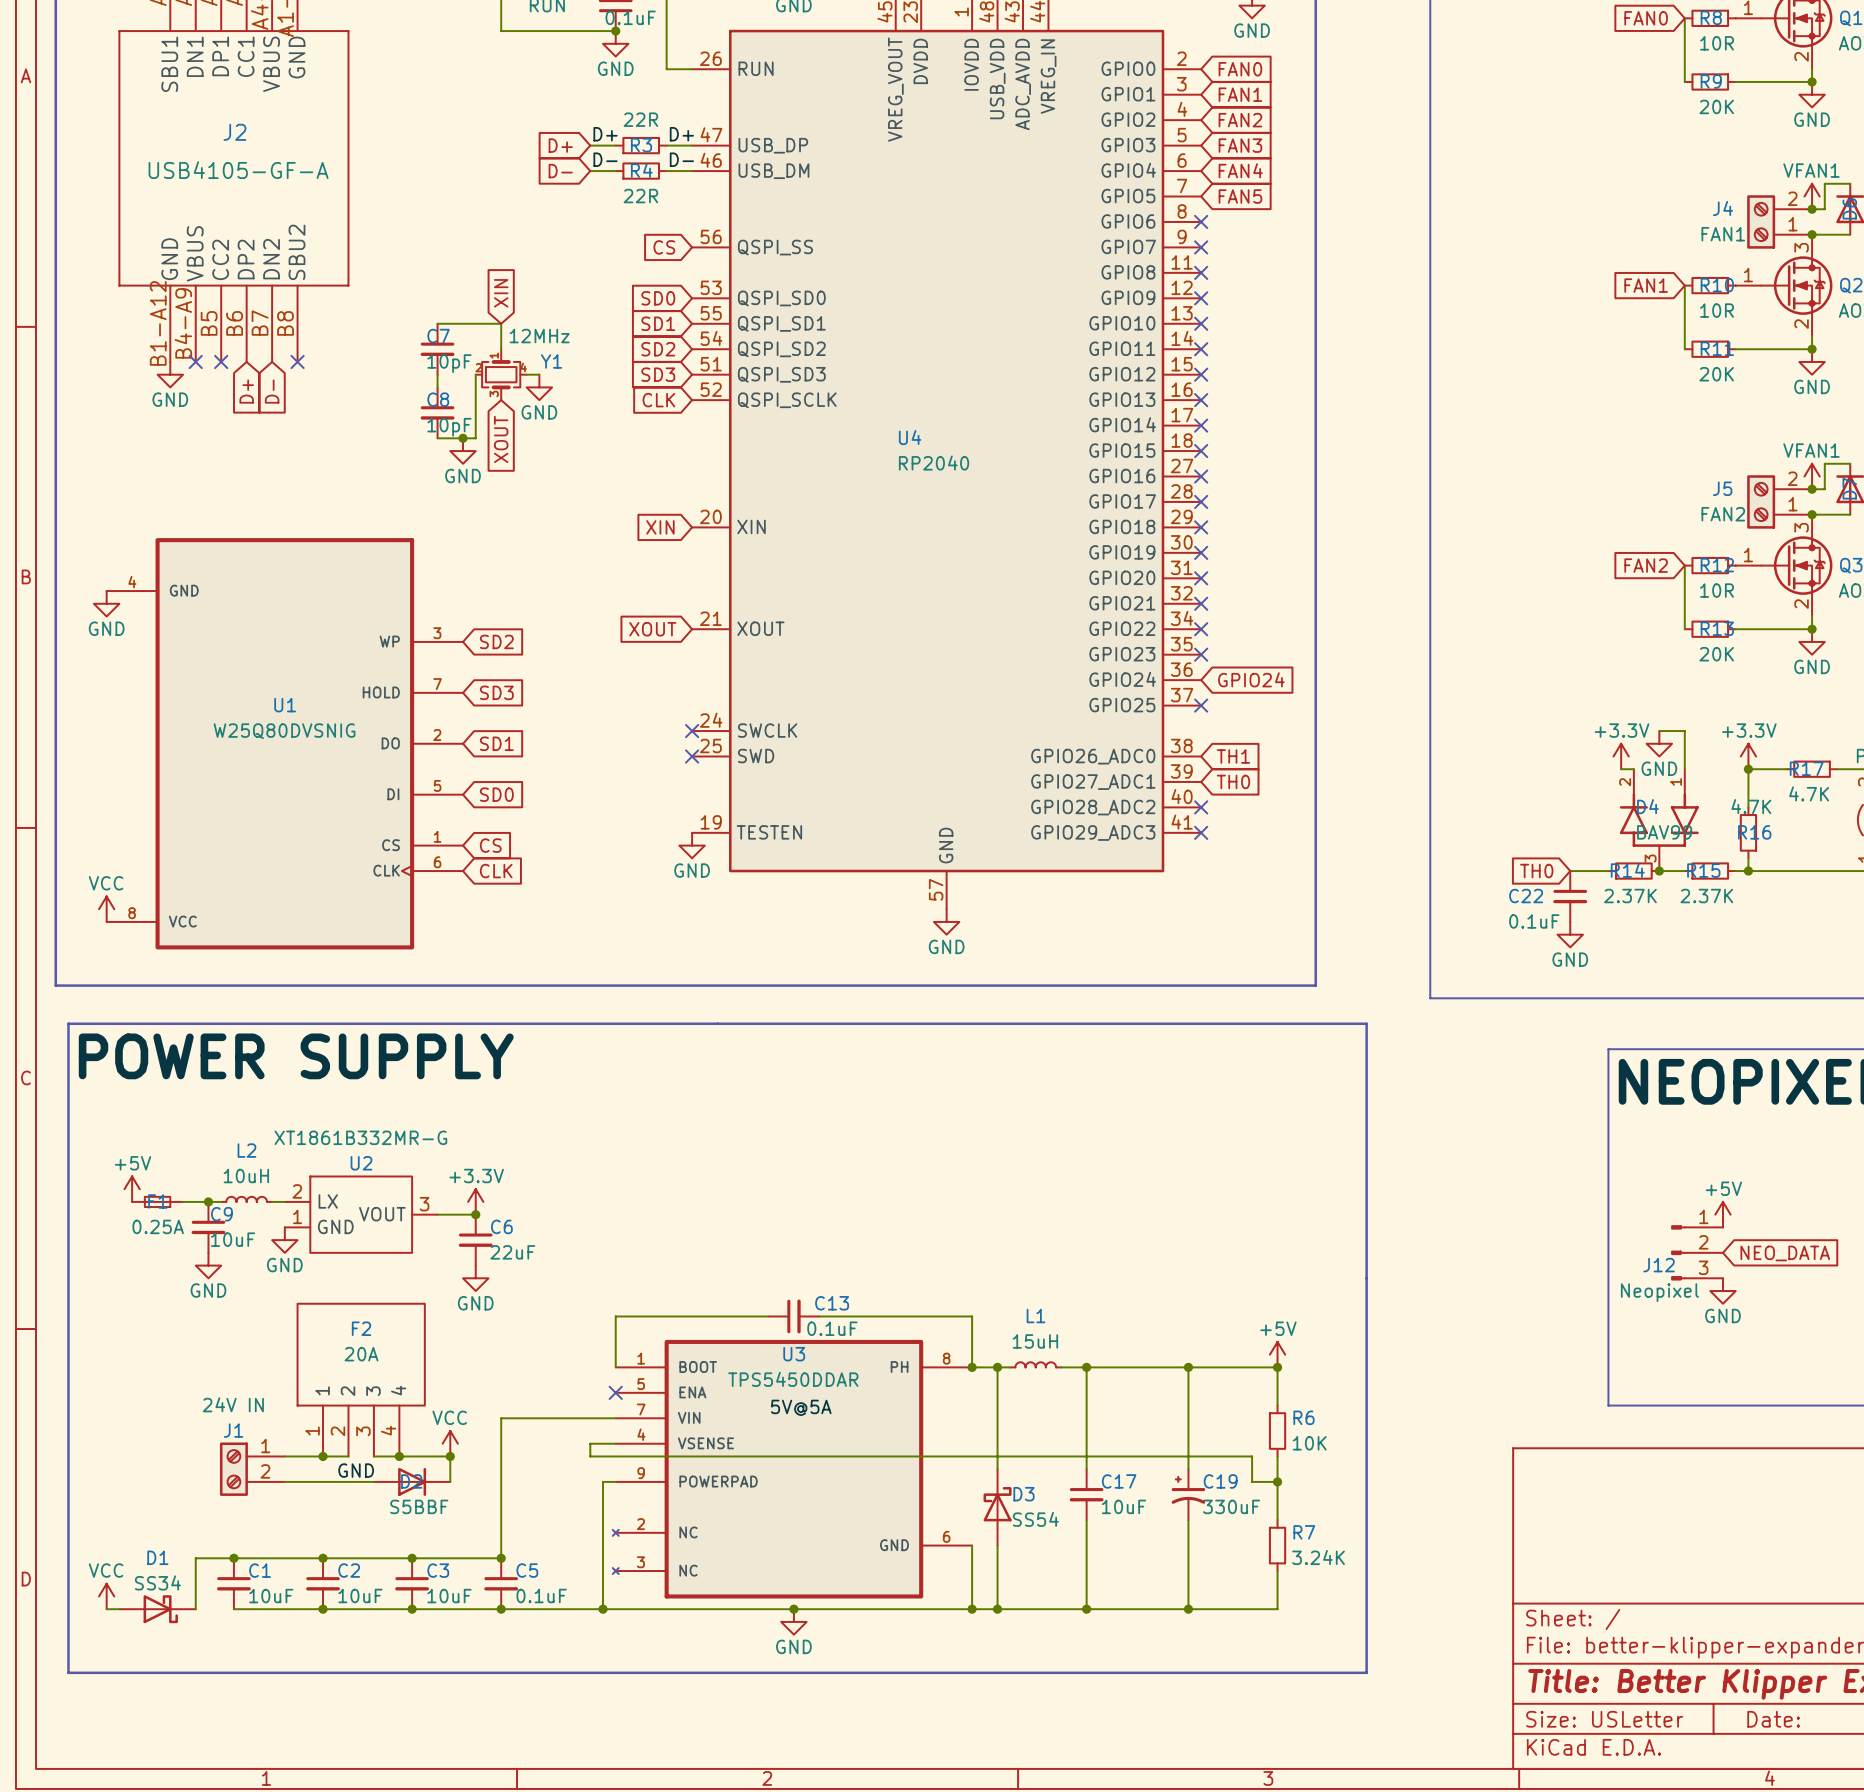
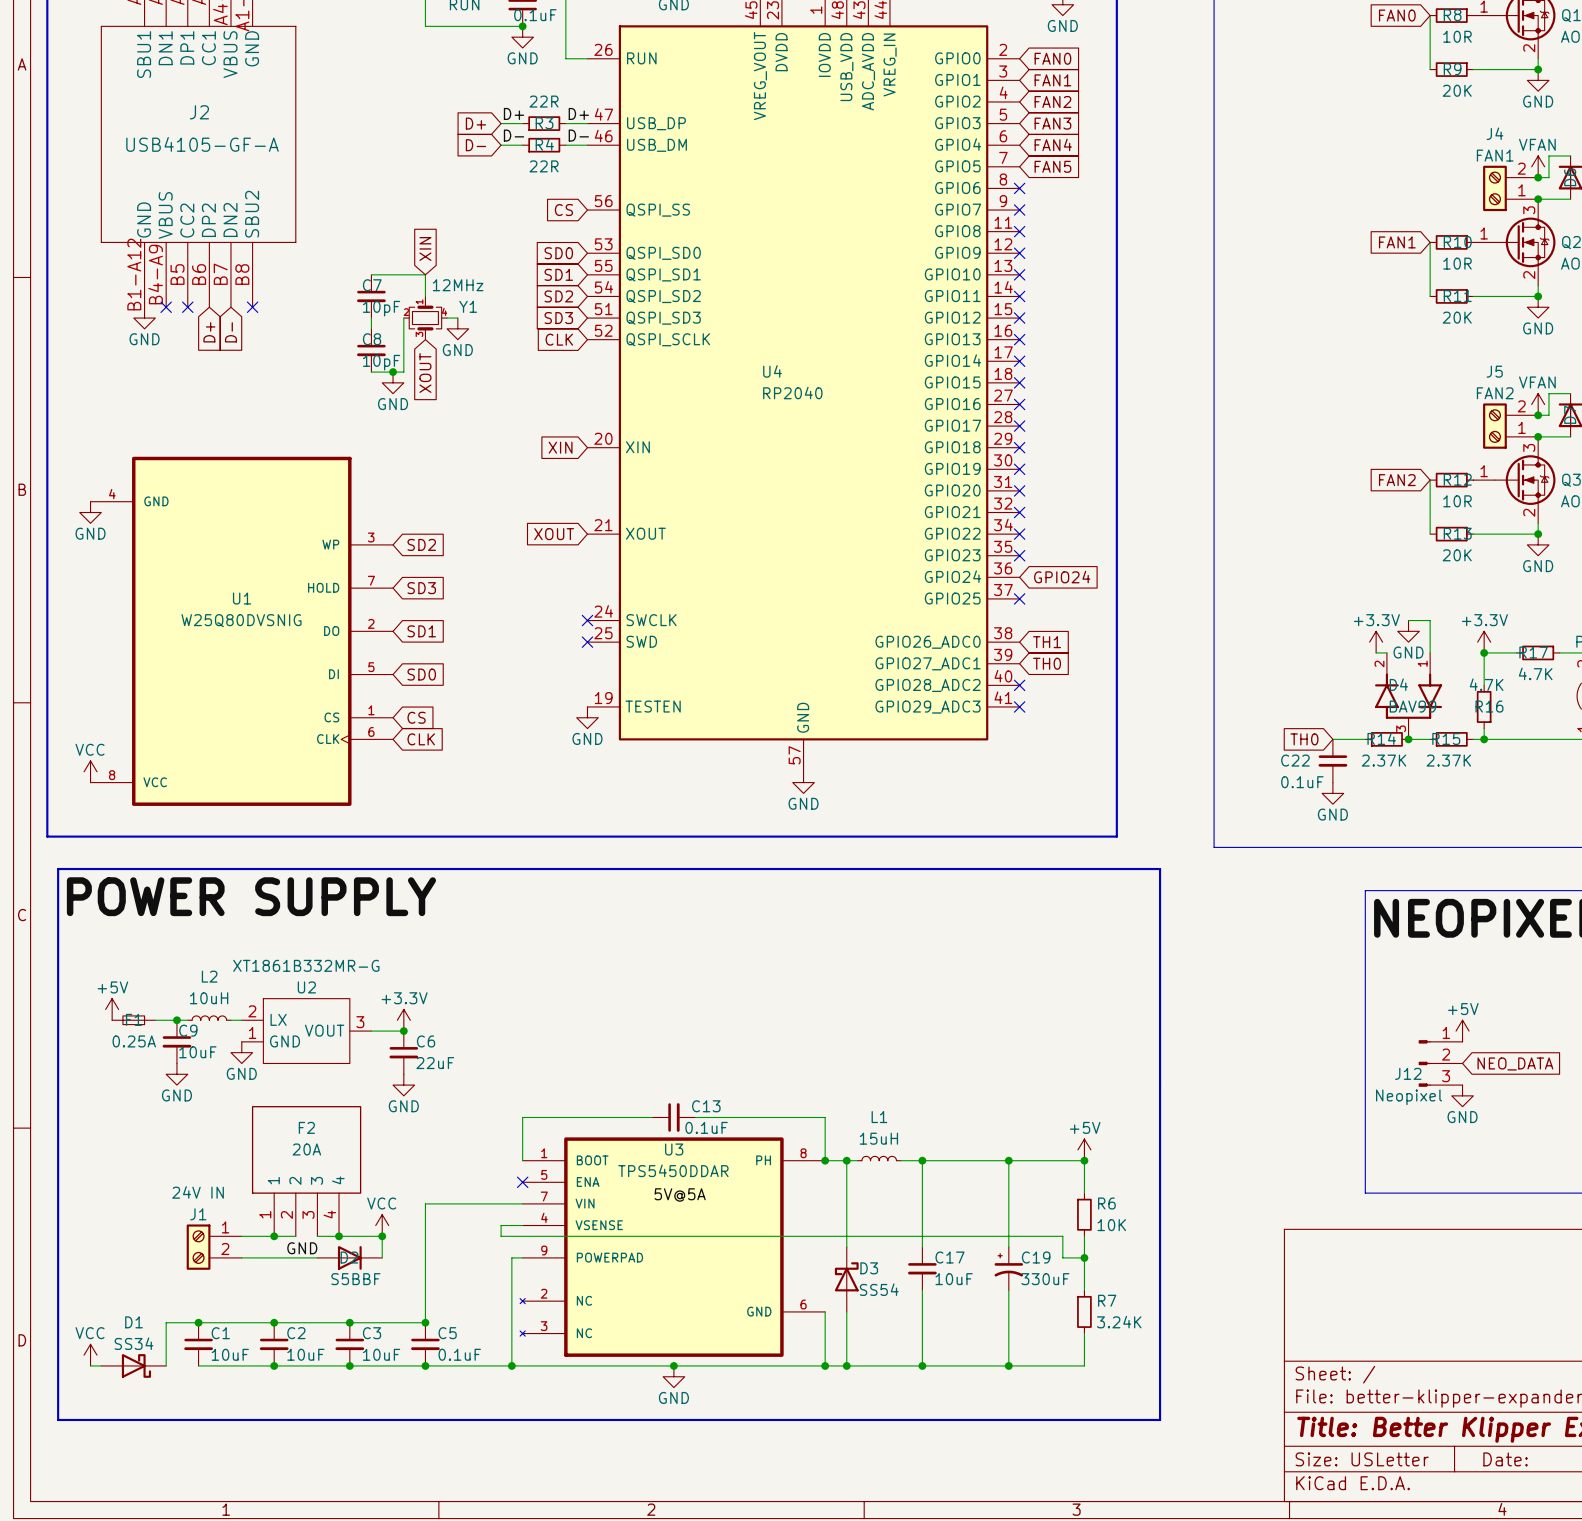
power symbol: VFAN1 (1812, 196) -> VFAN (1538, 166)
J4 name position: J4 (1722, 208) -> J4 (1494, 133)
J4 value position: FAN1 (1723, 234) -> FAN1 (1495, 155)
power symbol: VFAN1 (1812, 476) -> VFAN (1538, 404)
J5 name position: J5 (1722, 488) -> J5 (1494, 371)
J5 value position: FAN2 (1723, 514) -> FAN2 (1495, 393)

